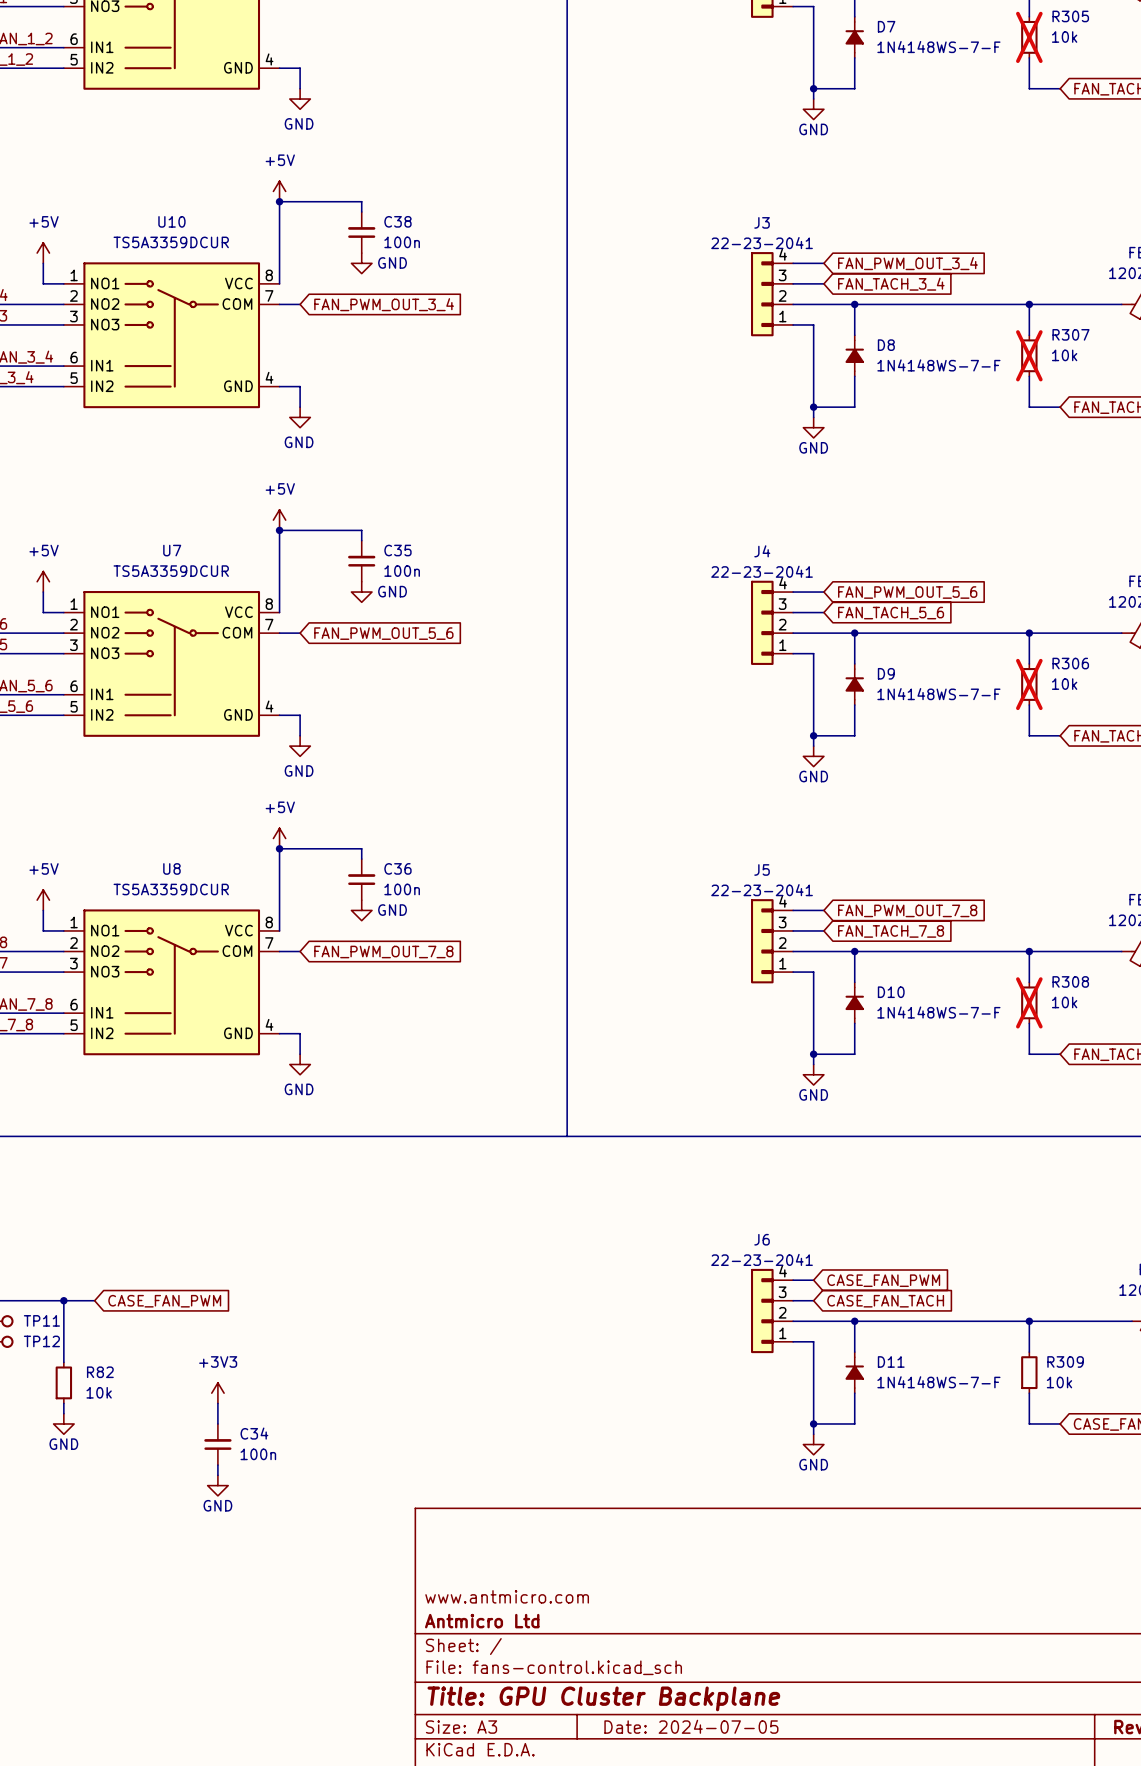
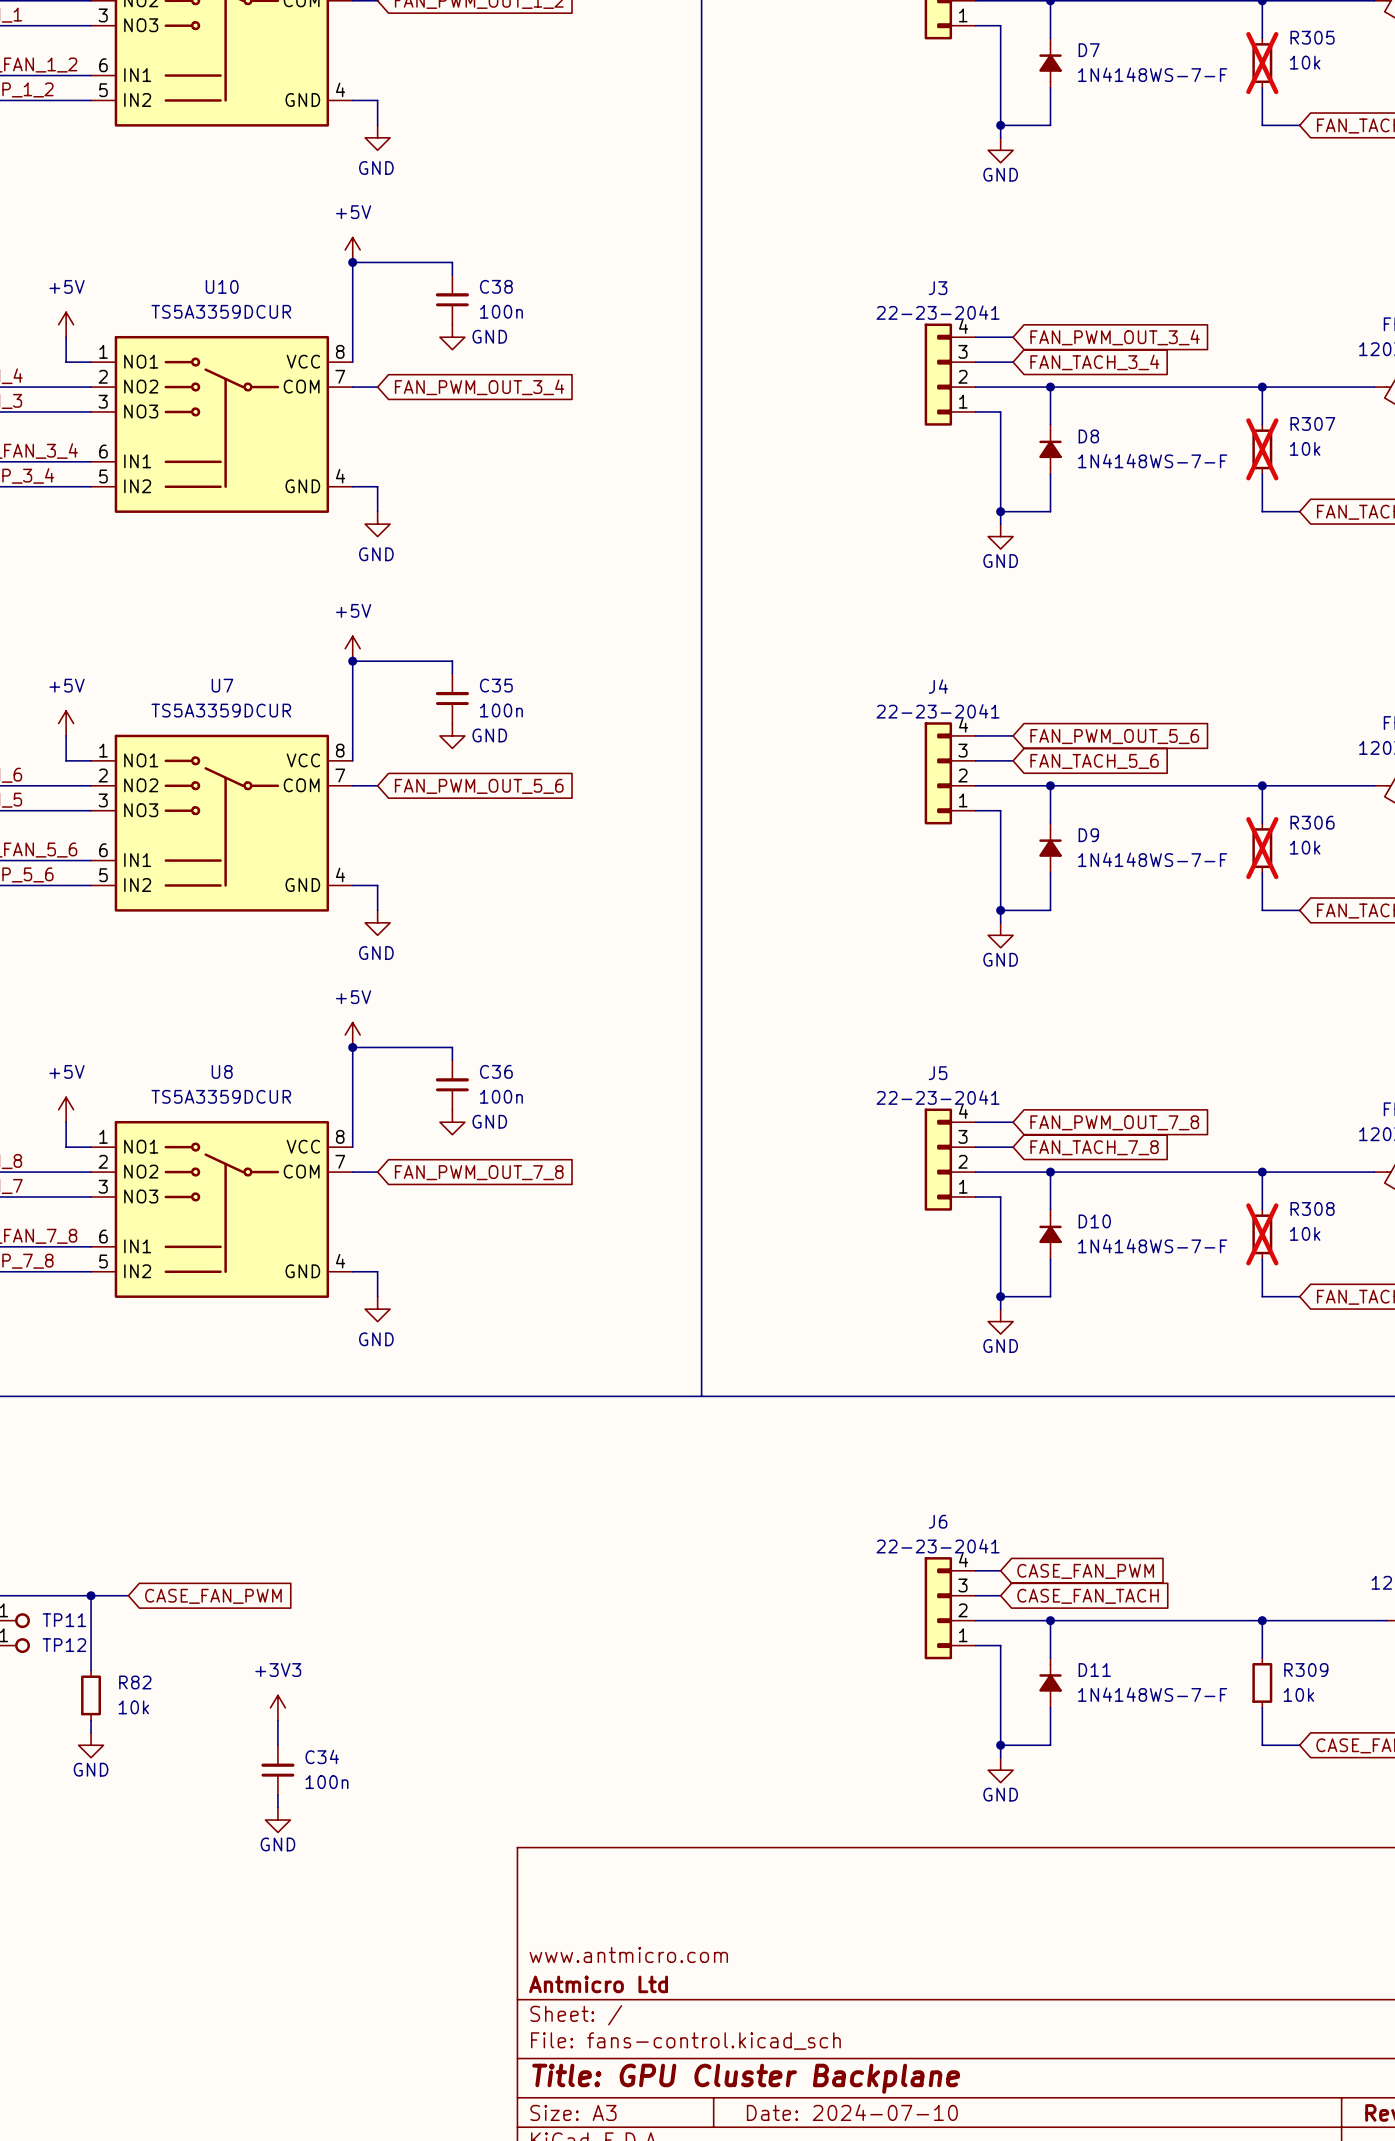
title block: Date: 2024-07-05 (691, 1726) -> Date: 2024-07-10 (852, 2112)

